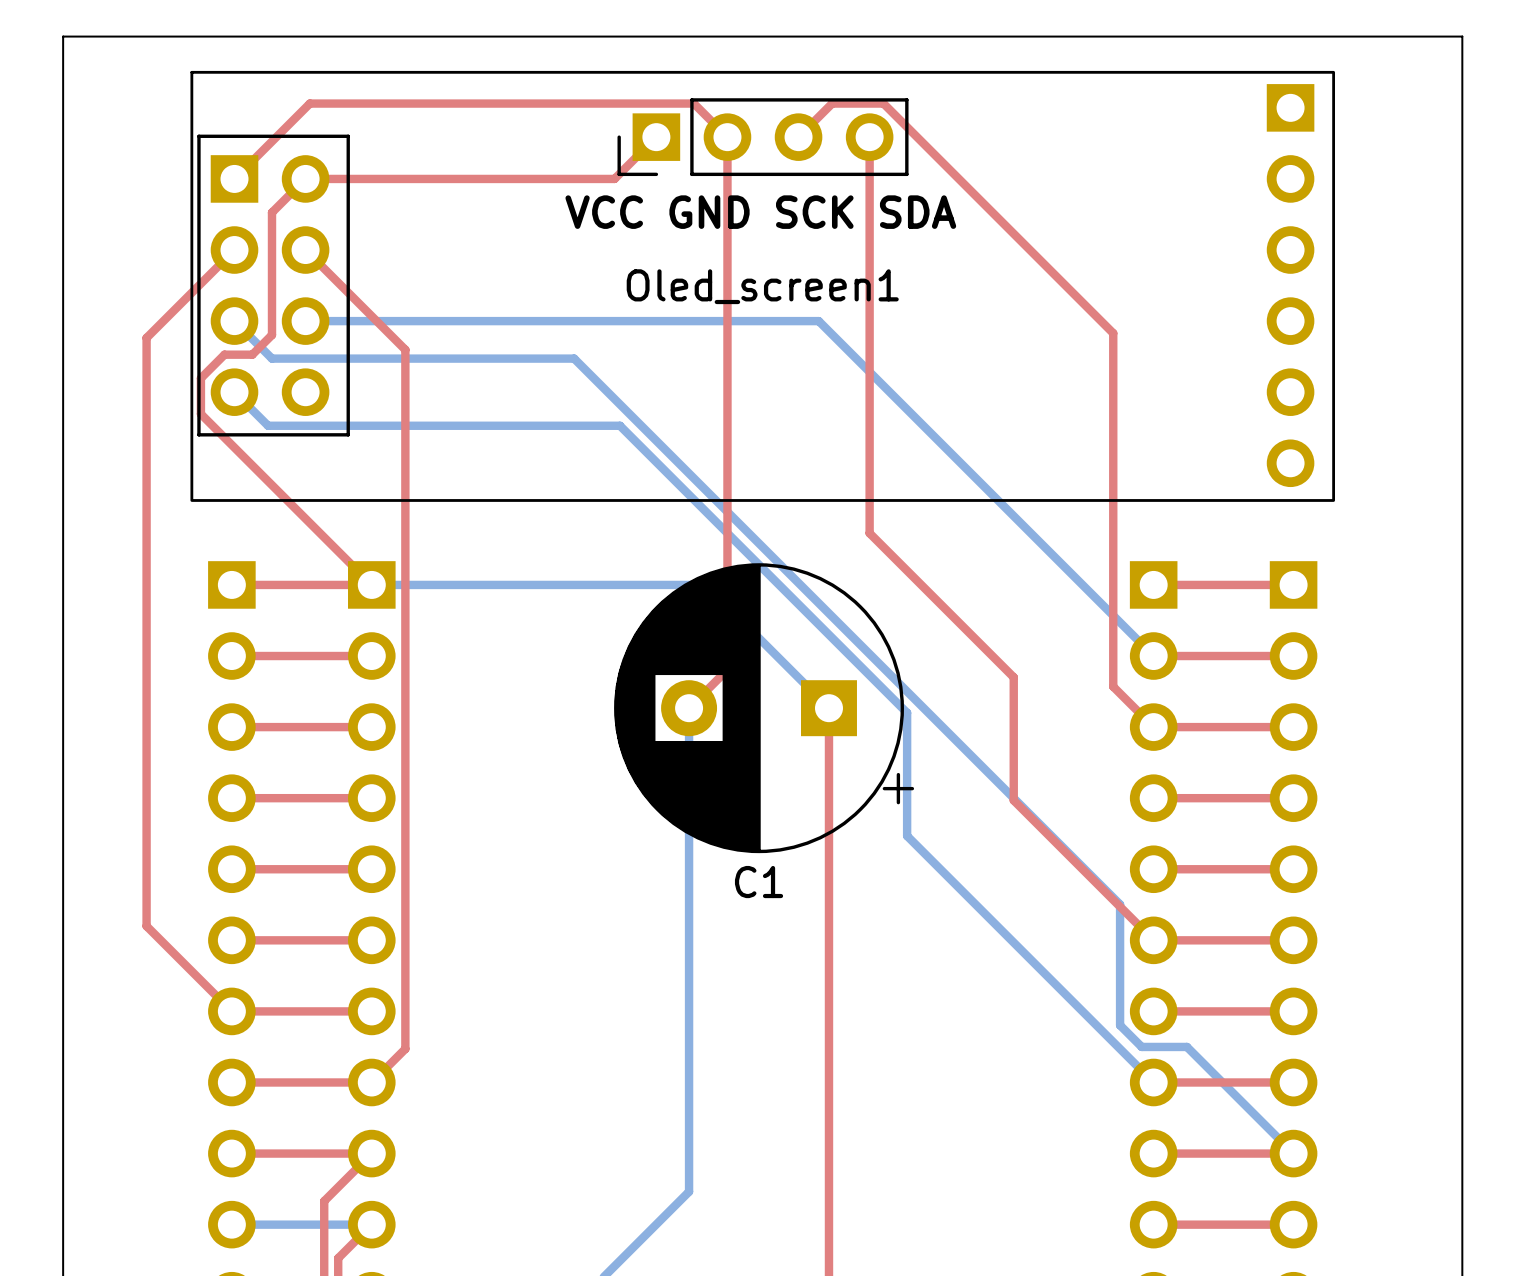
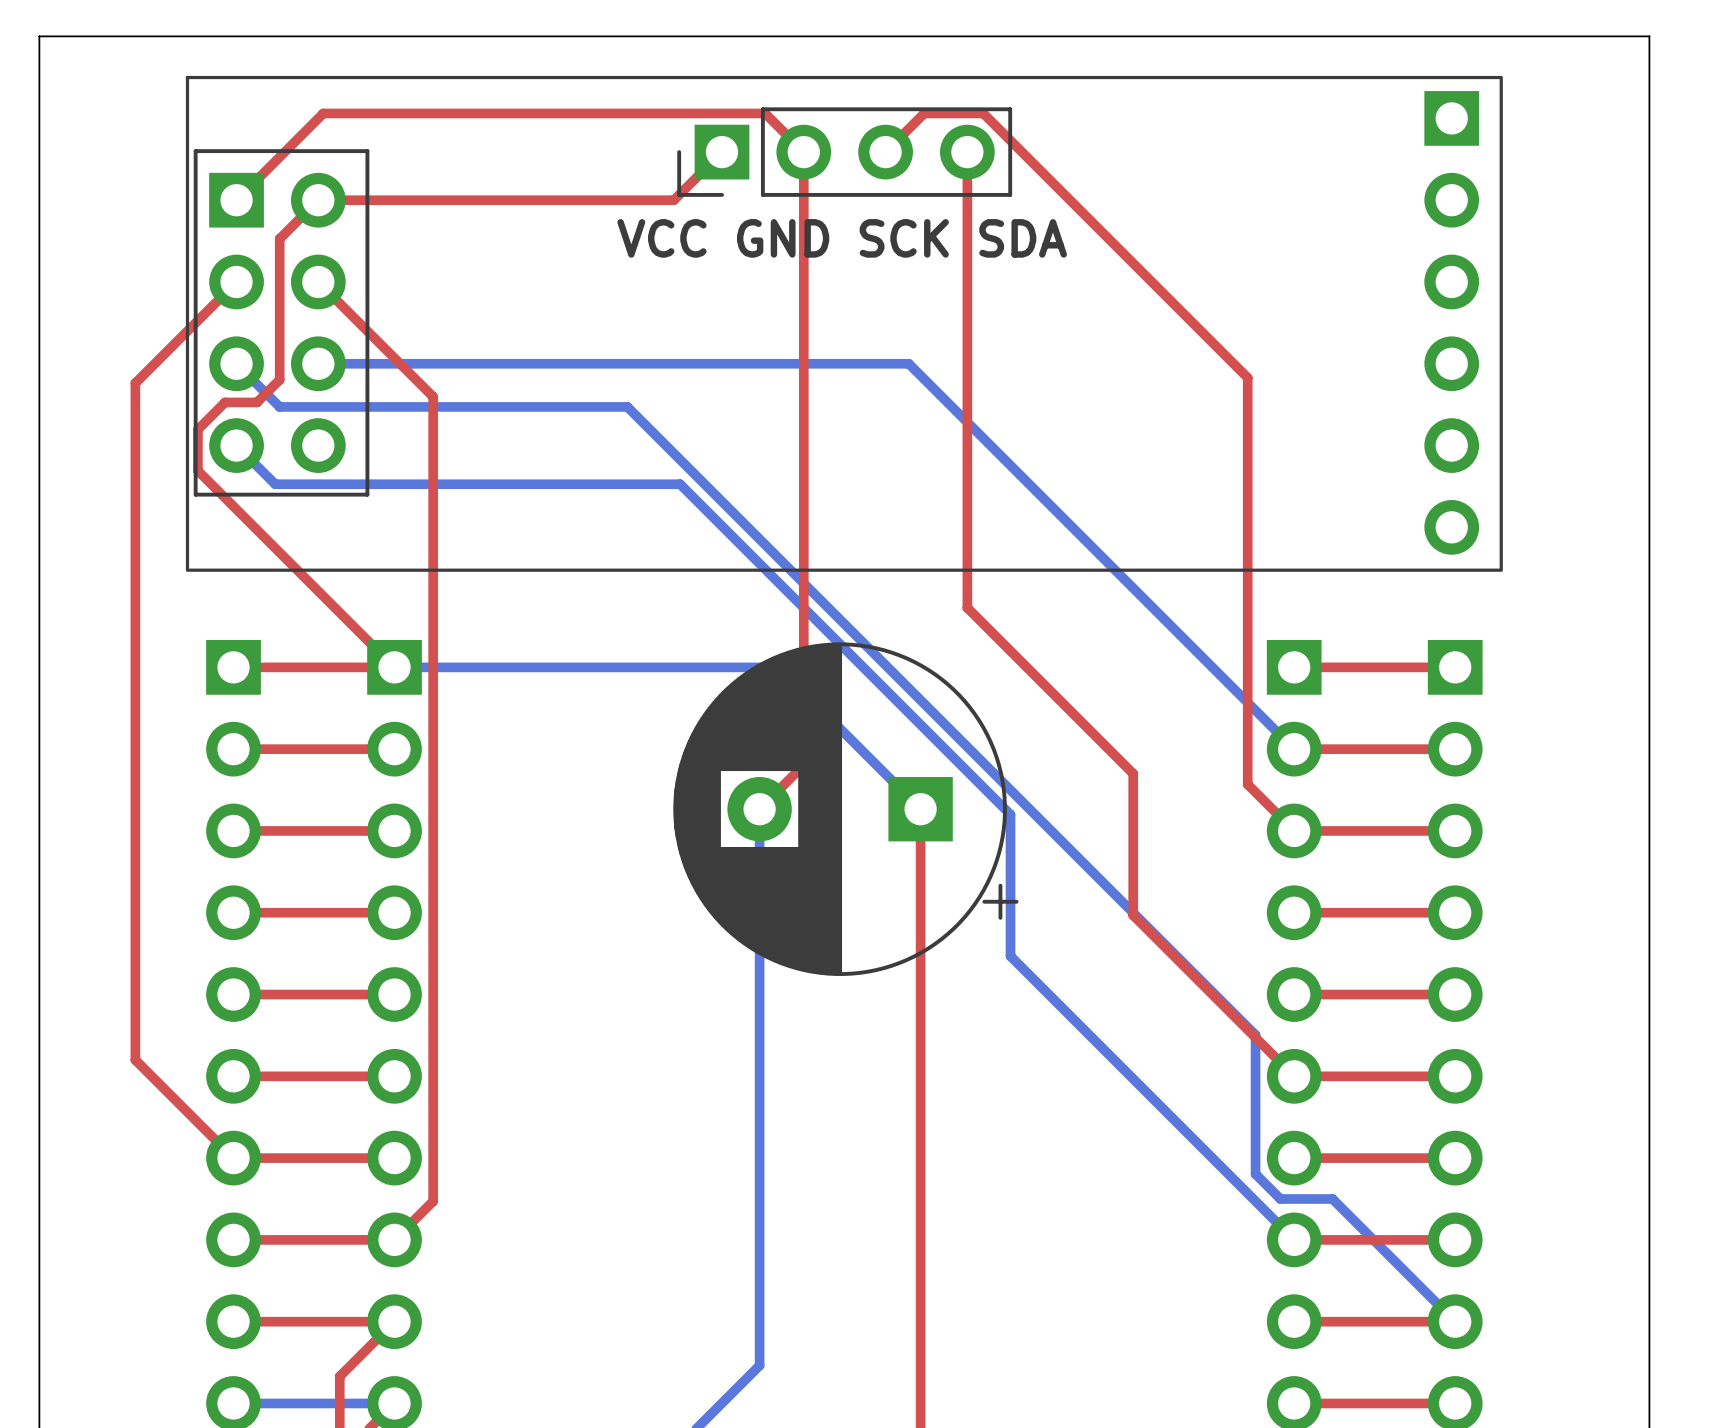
Oled_screen1 name: Oled_screen1 (762, 286) -> none
C1 name: C1 (759, 882) -> none

